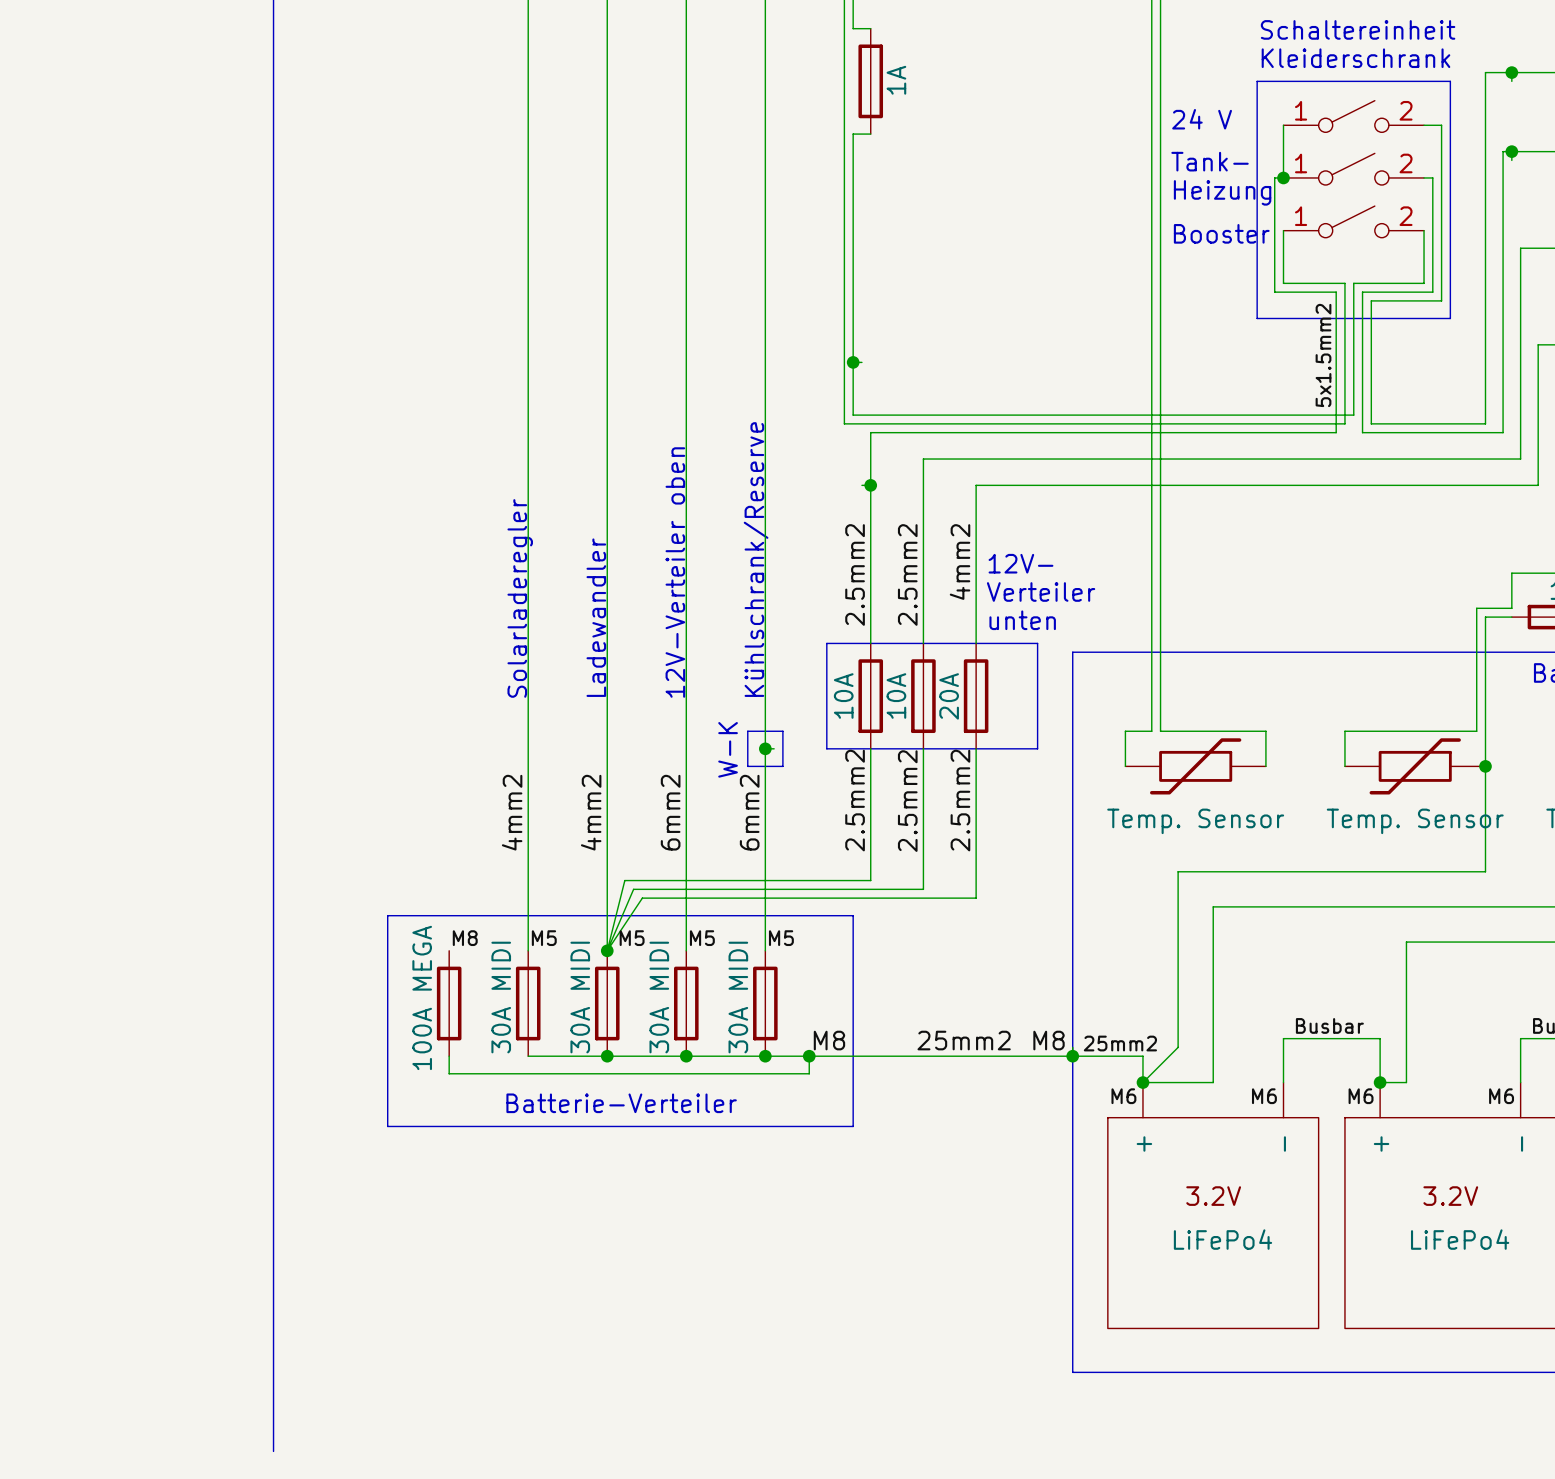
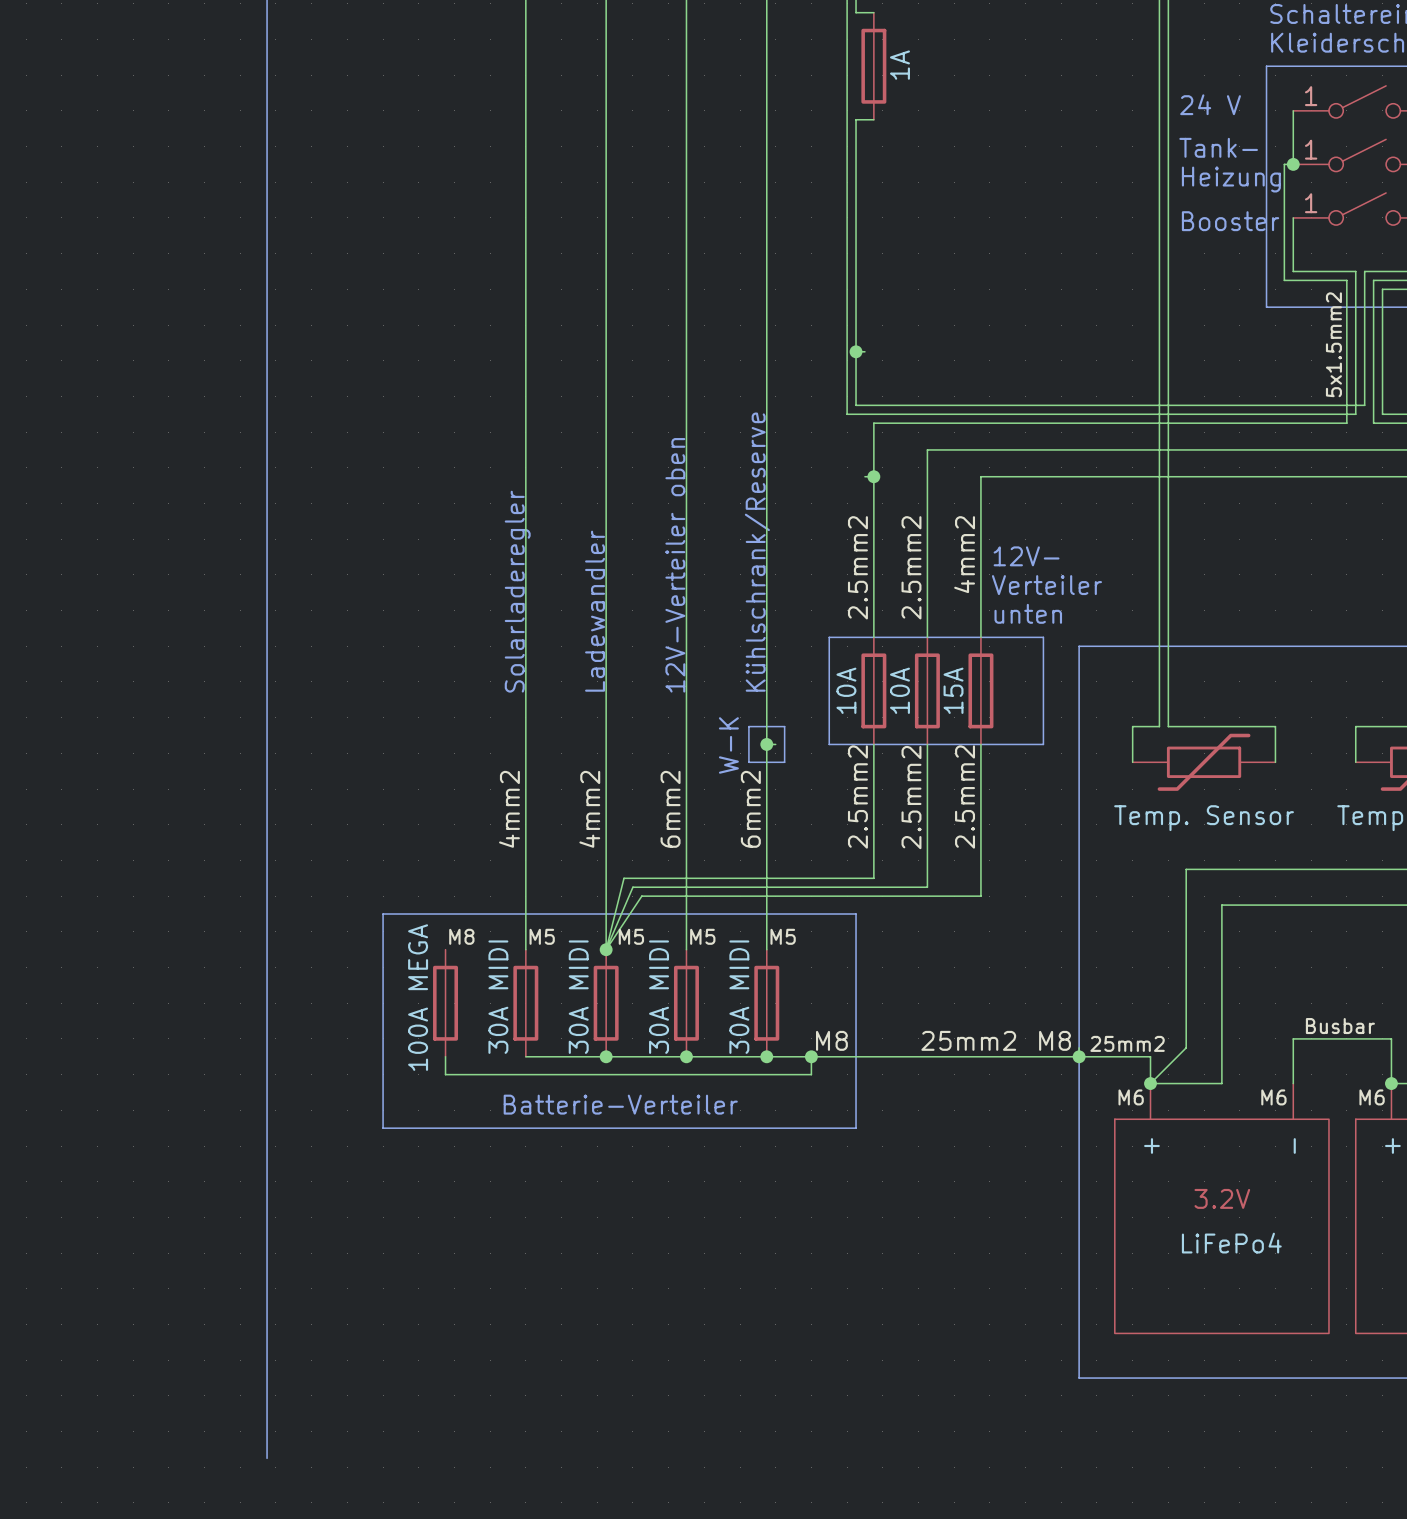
part value: 20A (949, 696) -> 15A (953, 690)

